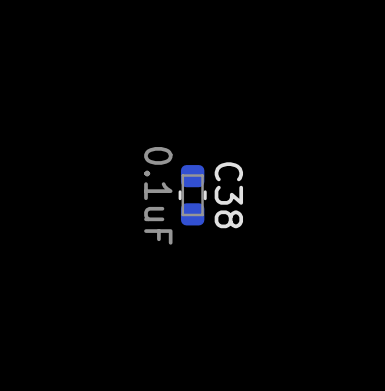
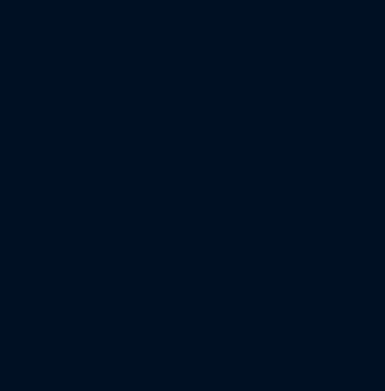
C38: 0.1uF (192, 195) -> none

